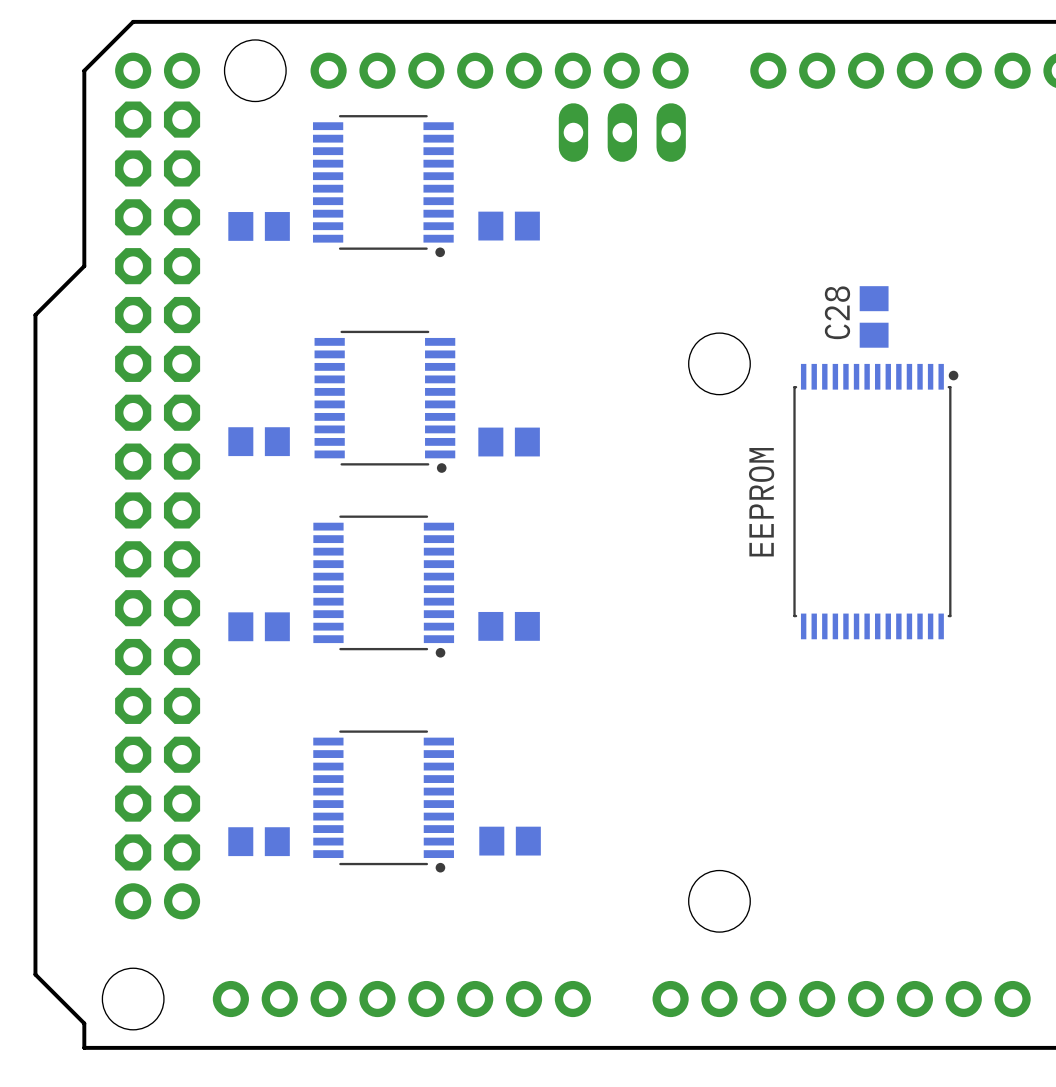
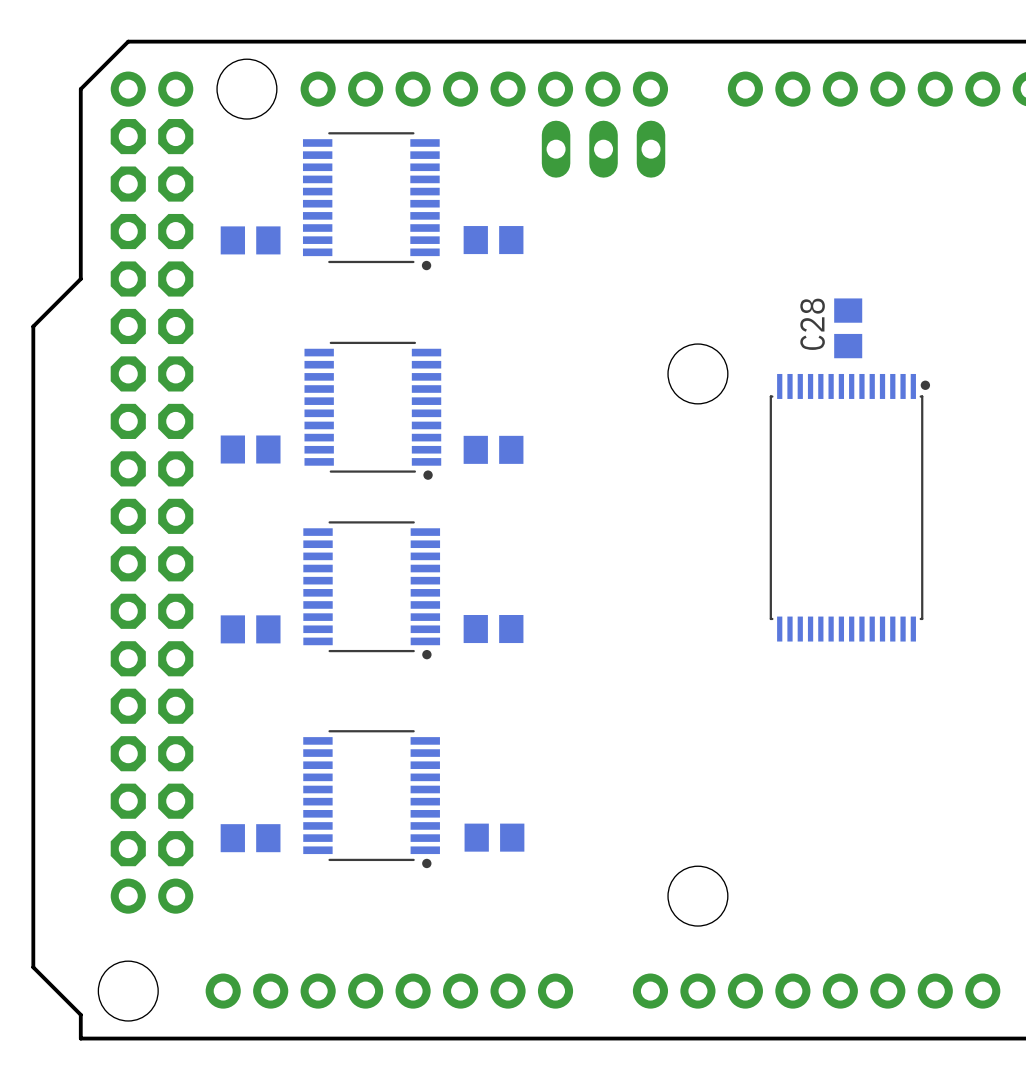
EEPROM name: EEPROM (761, 502) -> none

